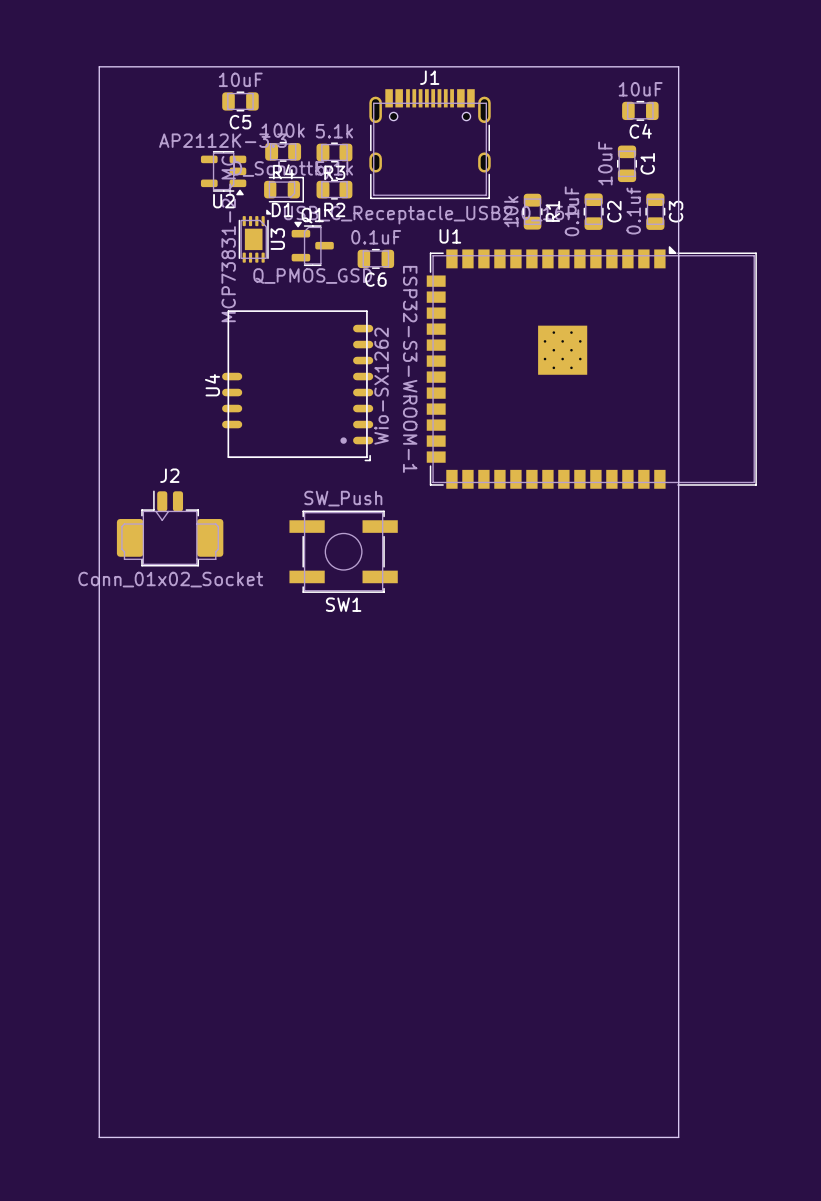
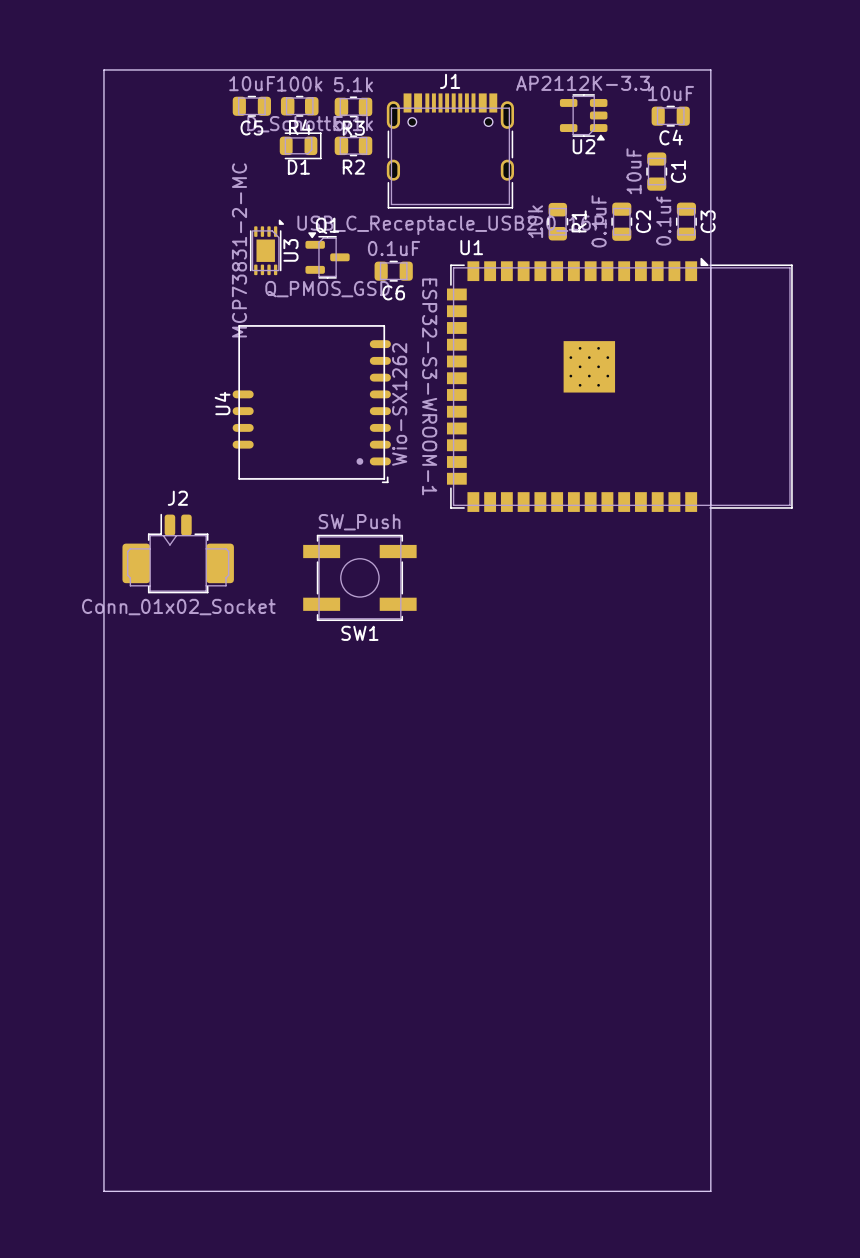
R4 position: (283, 151) -> (299, 106)
R3 position: (334, 152) -> (353, 106)
U2 position: (223, 173) -> (583, 117)
D1 position: (284, 189) -> (300, 145)
R2 position: (334, 189) -> (353, 145)

